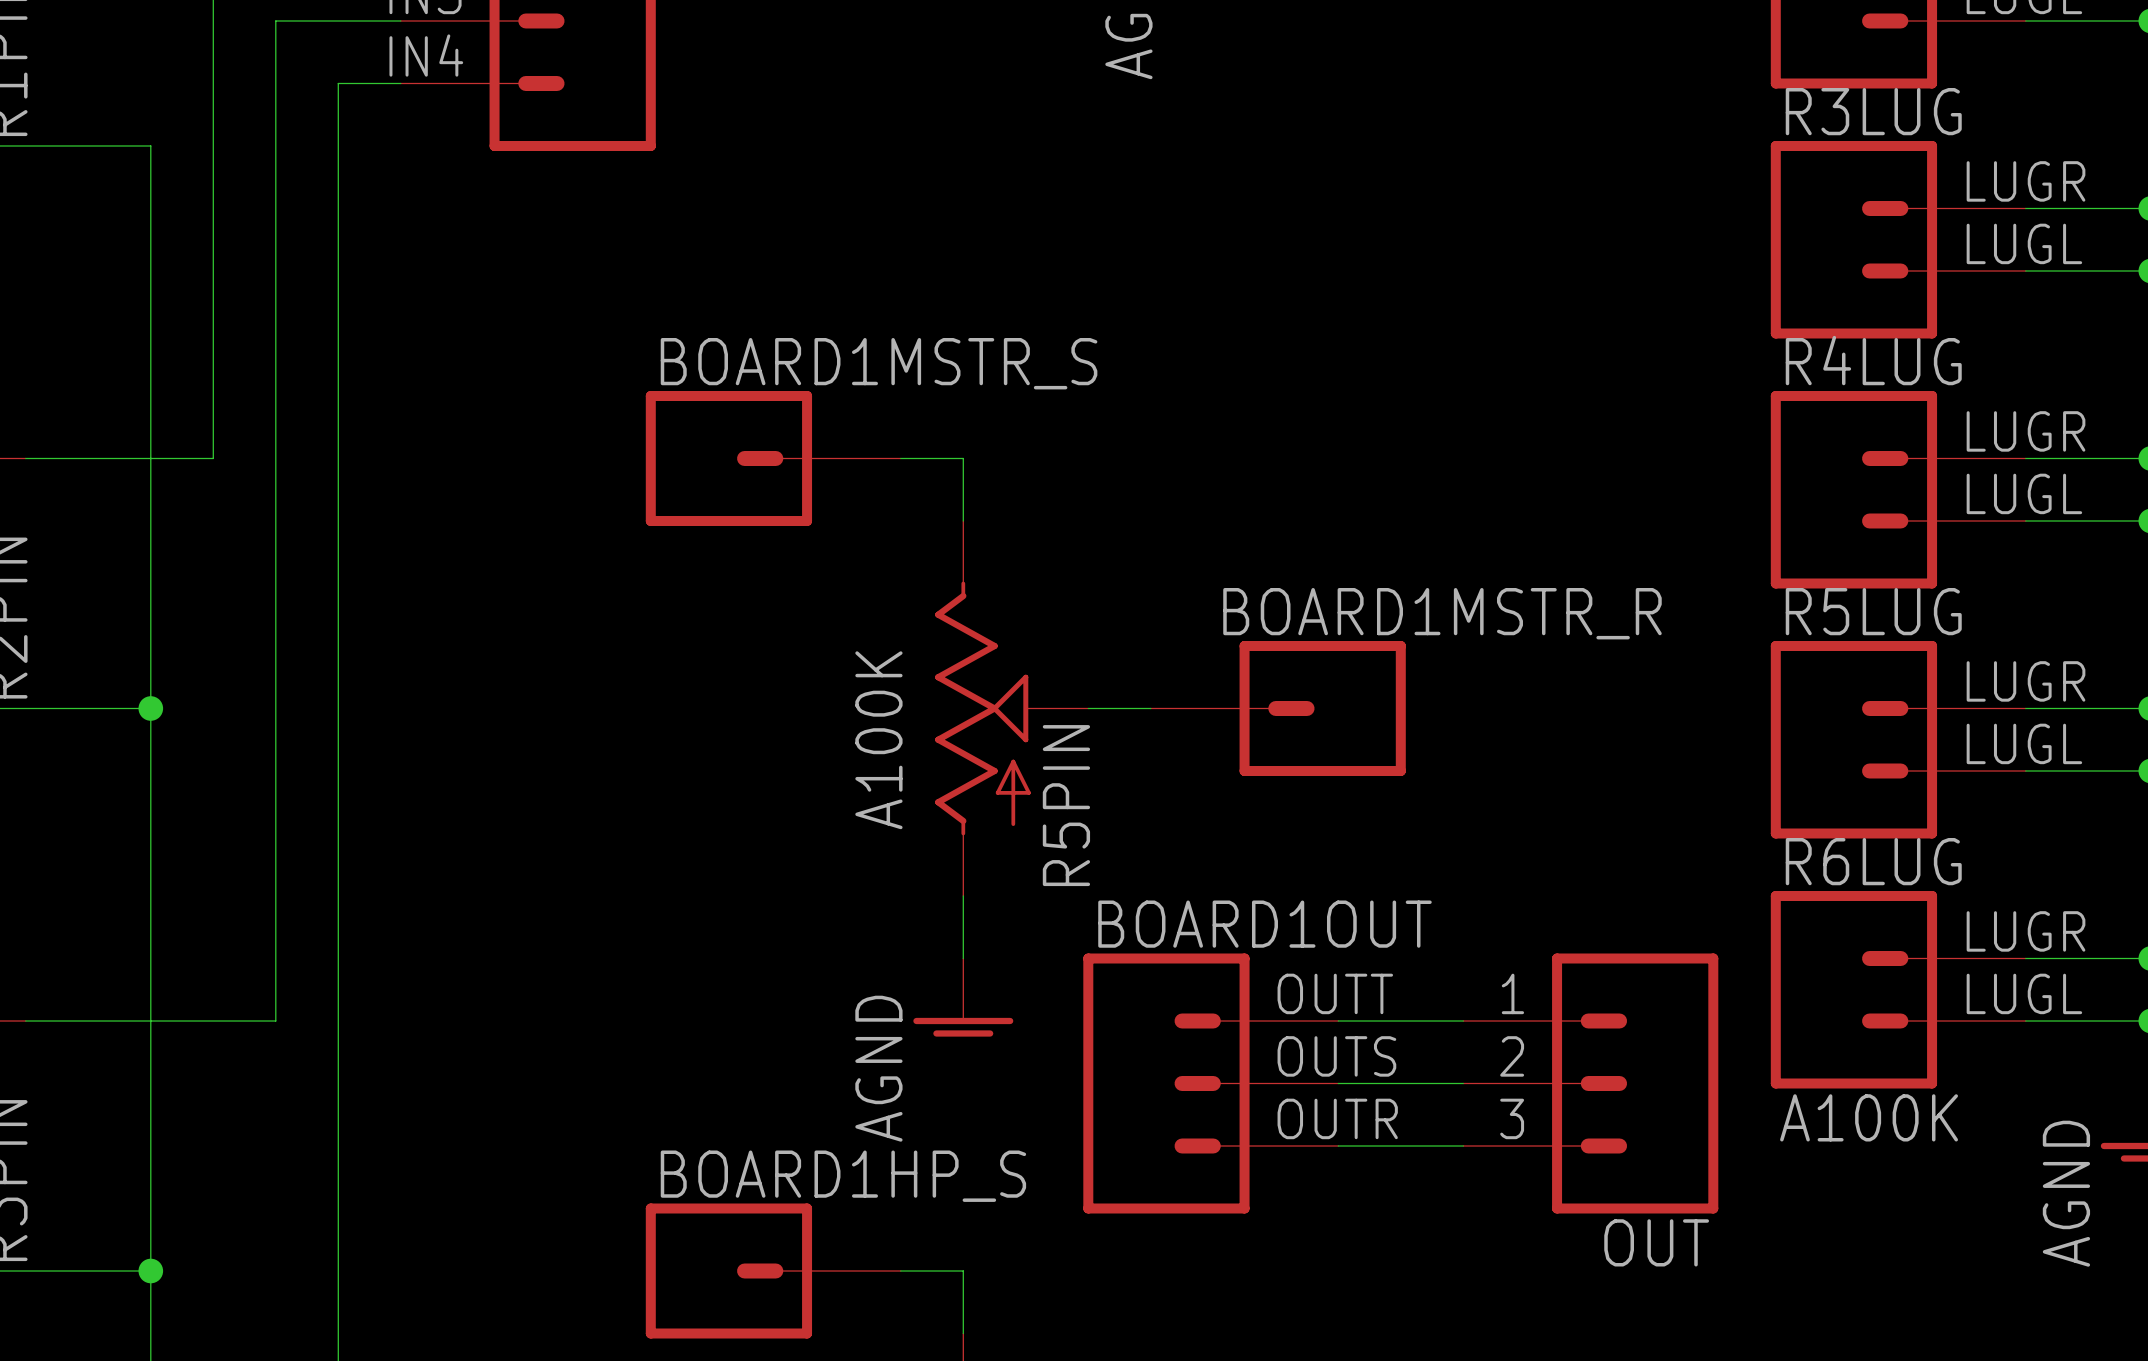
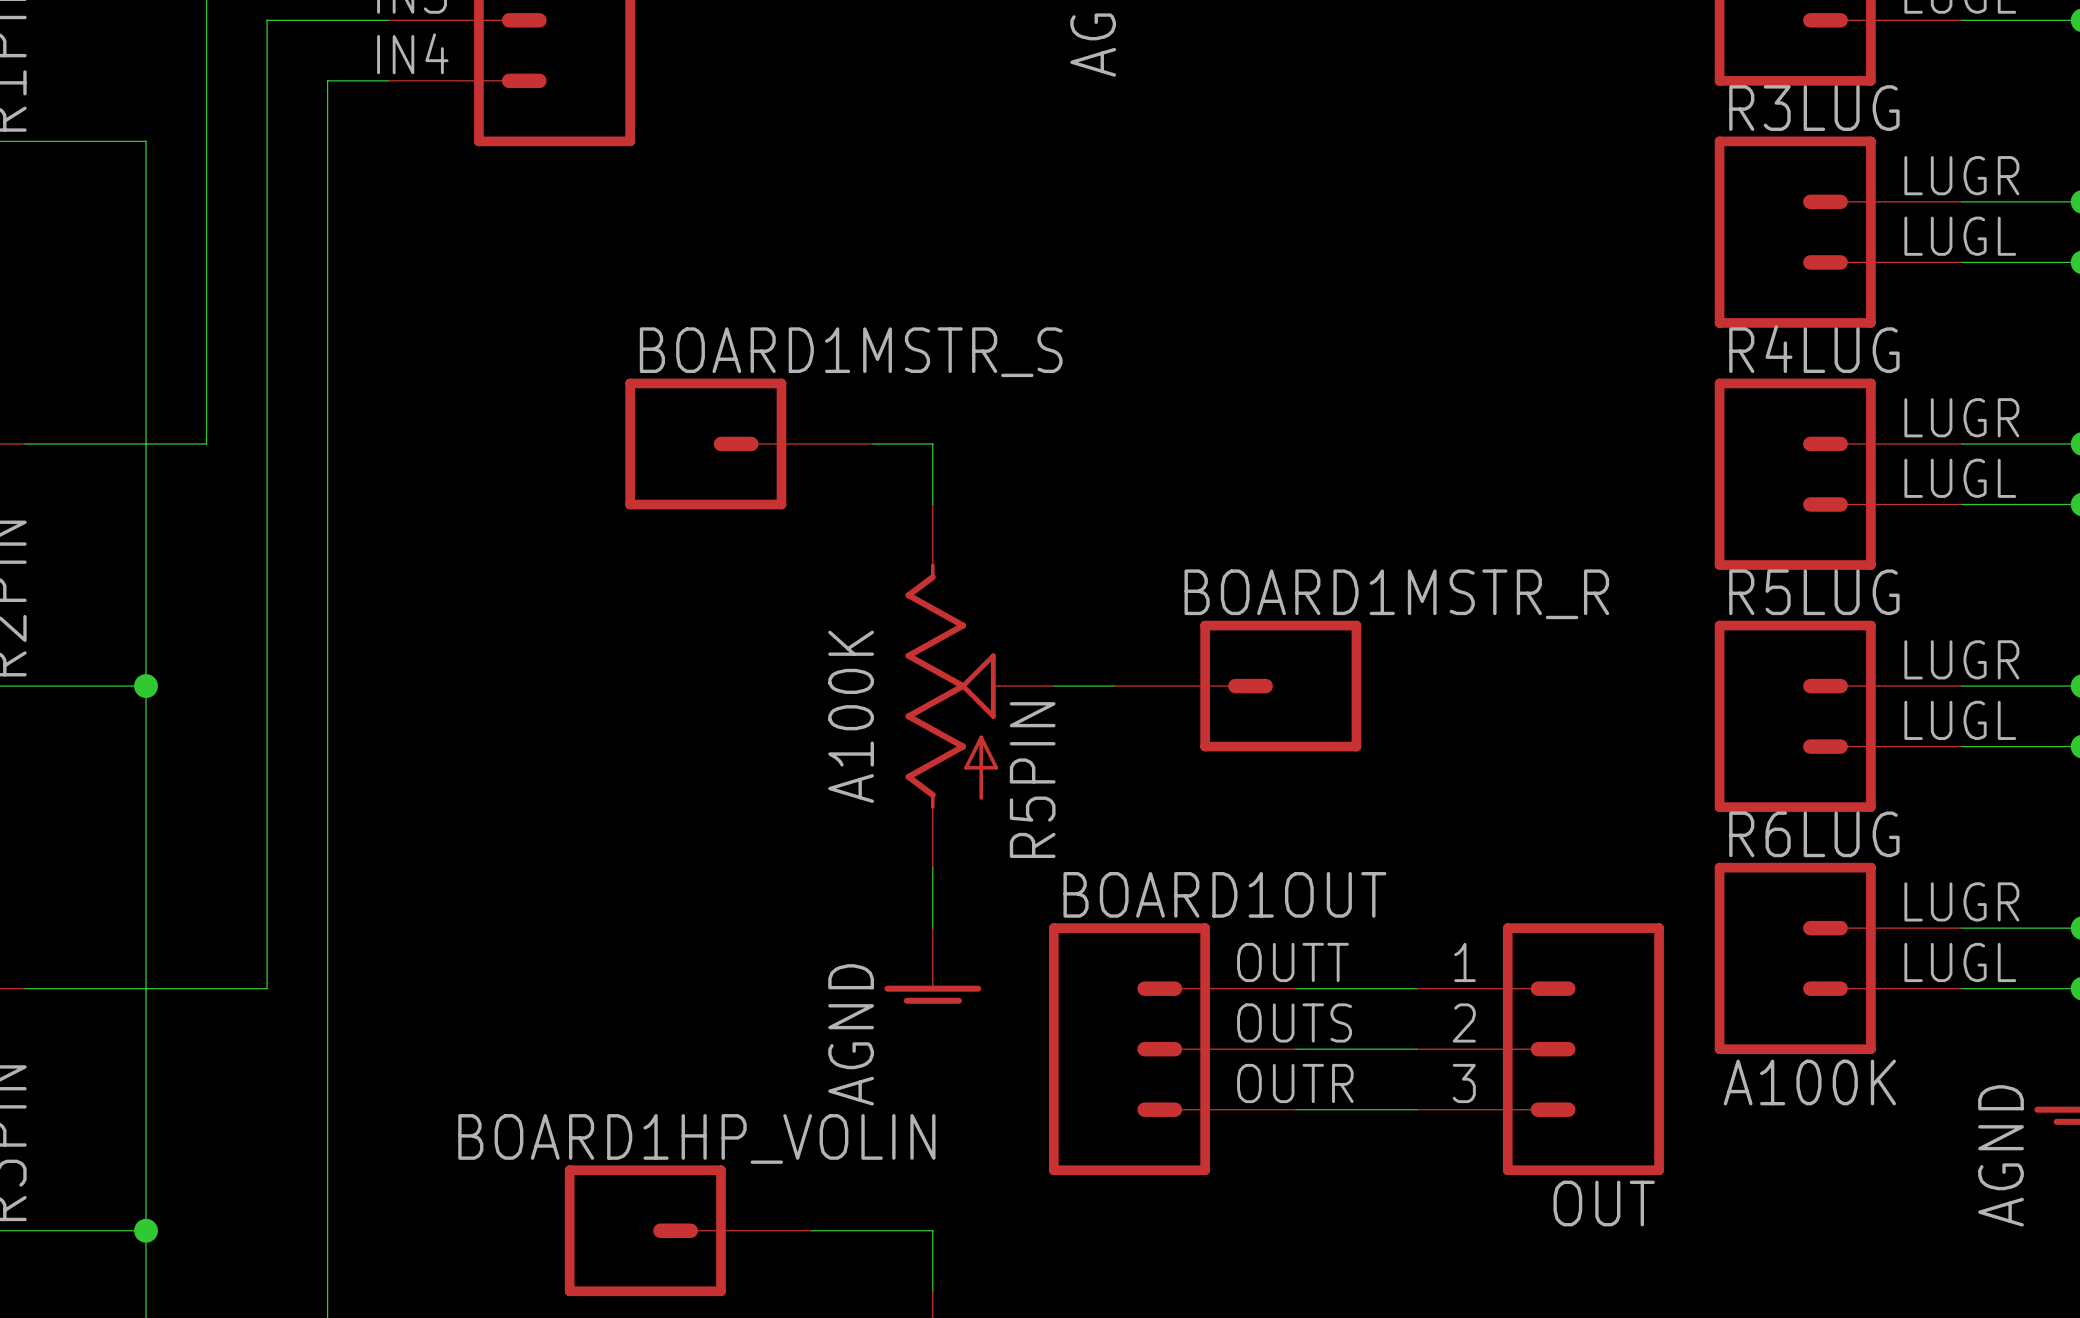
BOARD1HP_VOLIN: none -> (688, 1230)
BOARD1HP_S: (773, 1271) -> none

